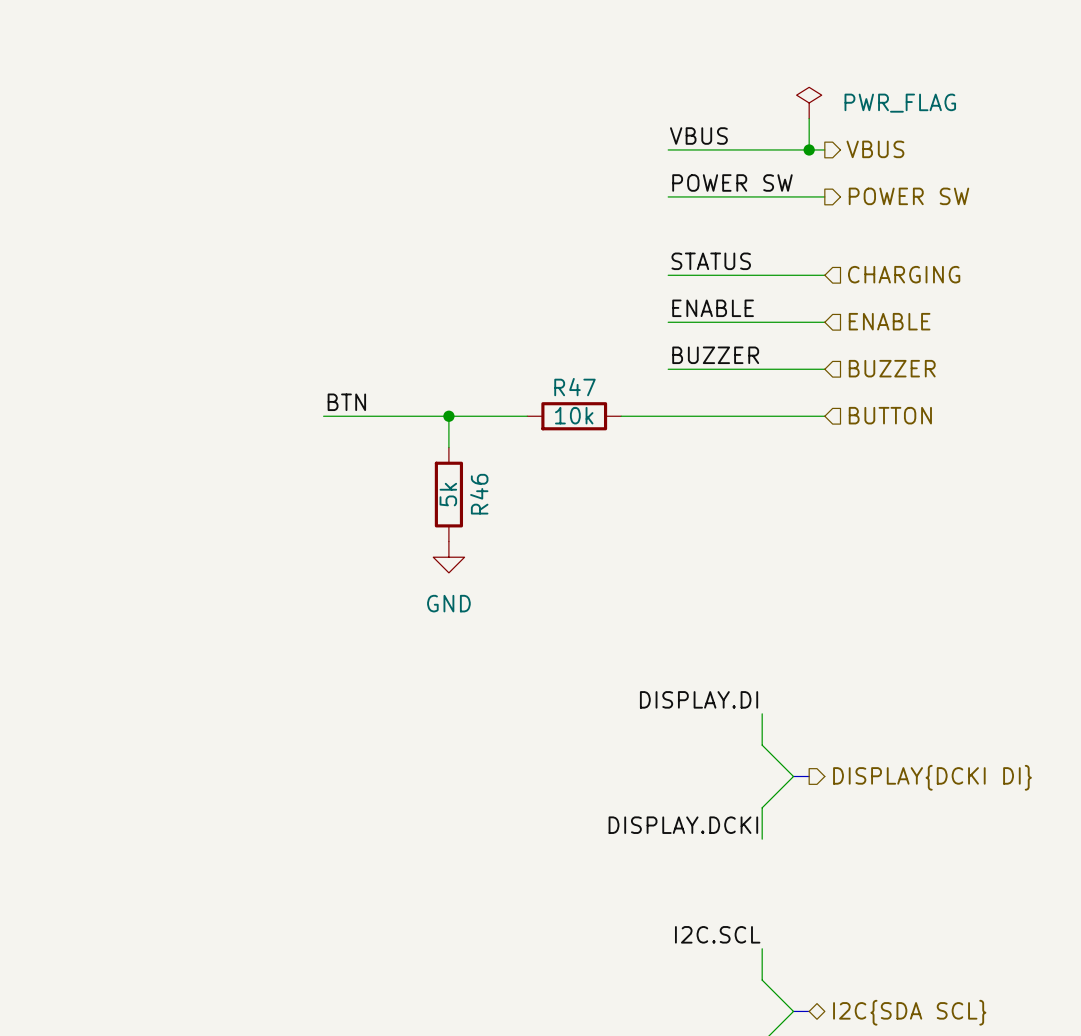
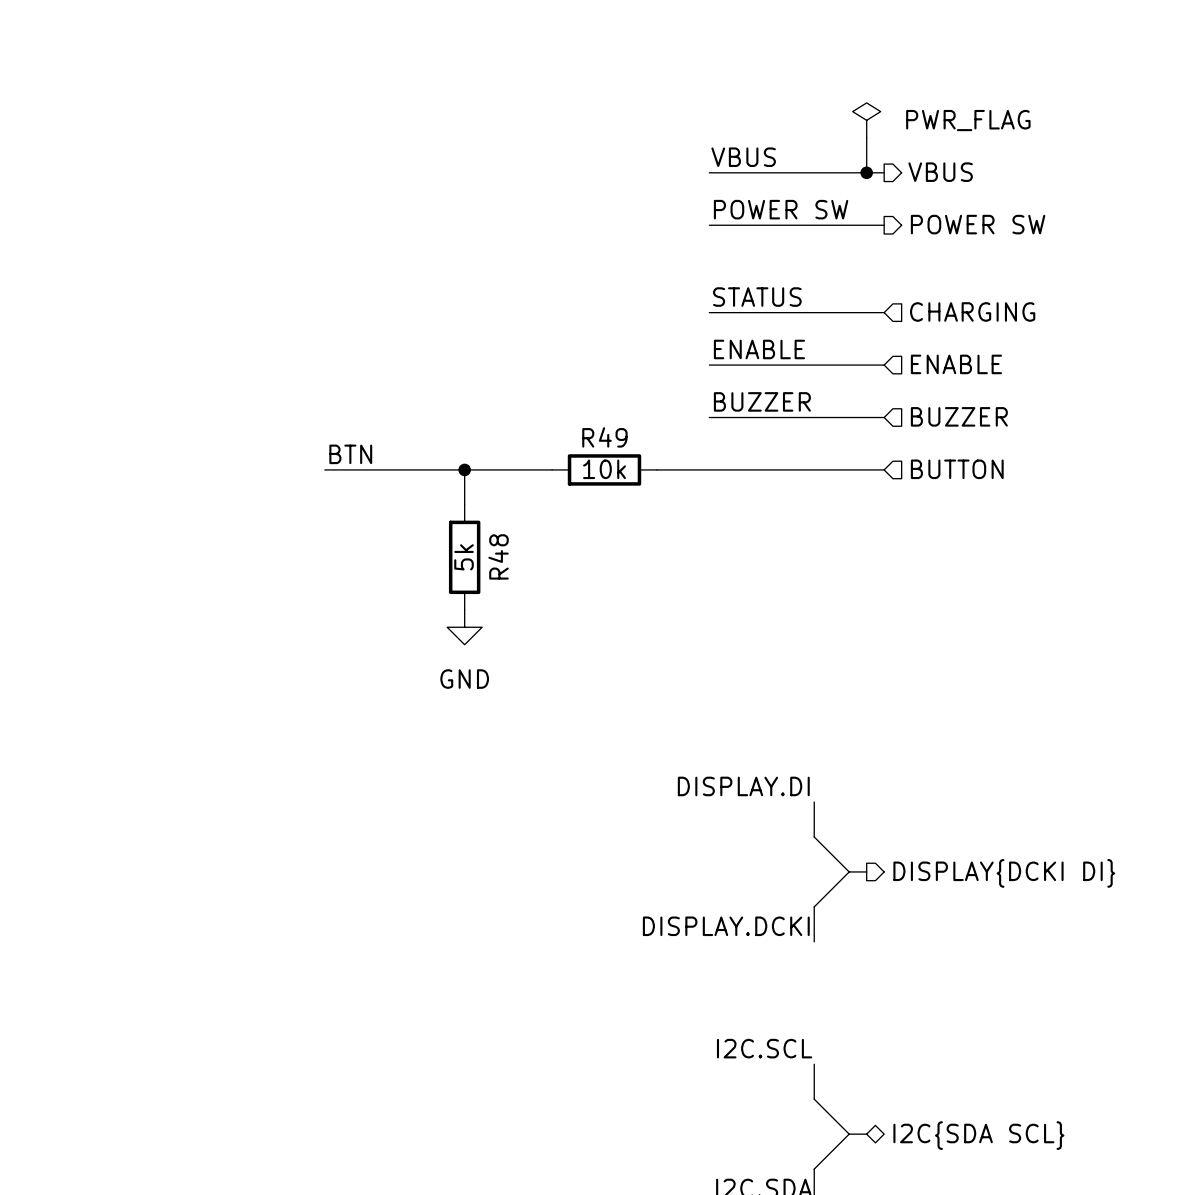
R47 name: R47 (574, 387) -> R49 (604, 437)
R46 name: R46 (479, 494) -> R48 (498, 556)

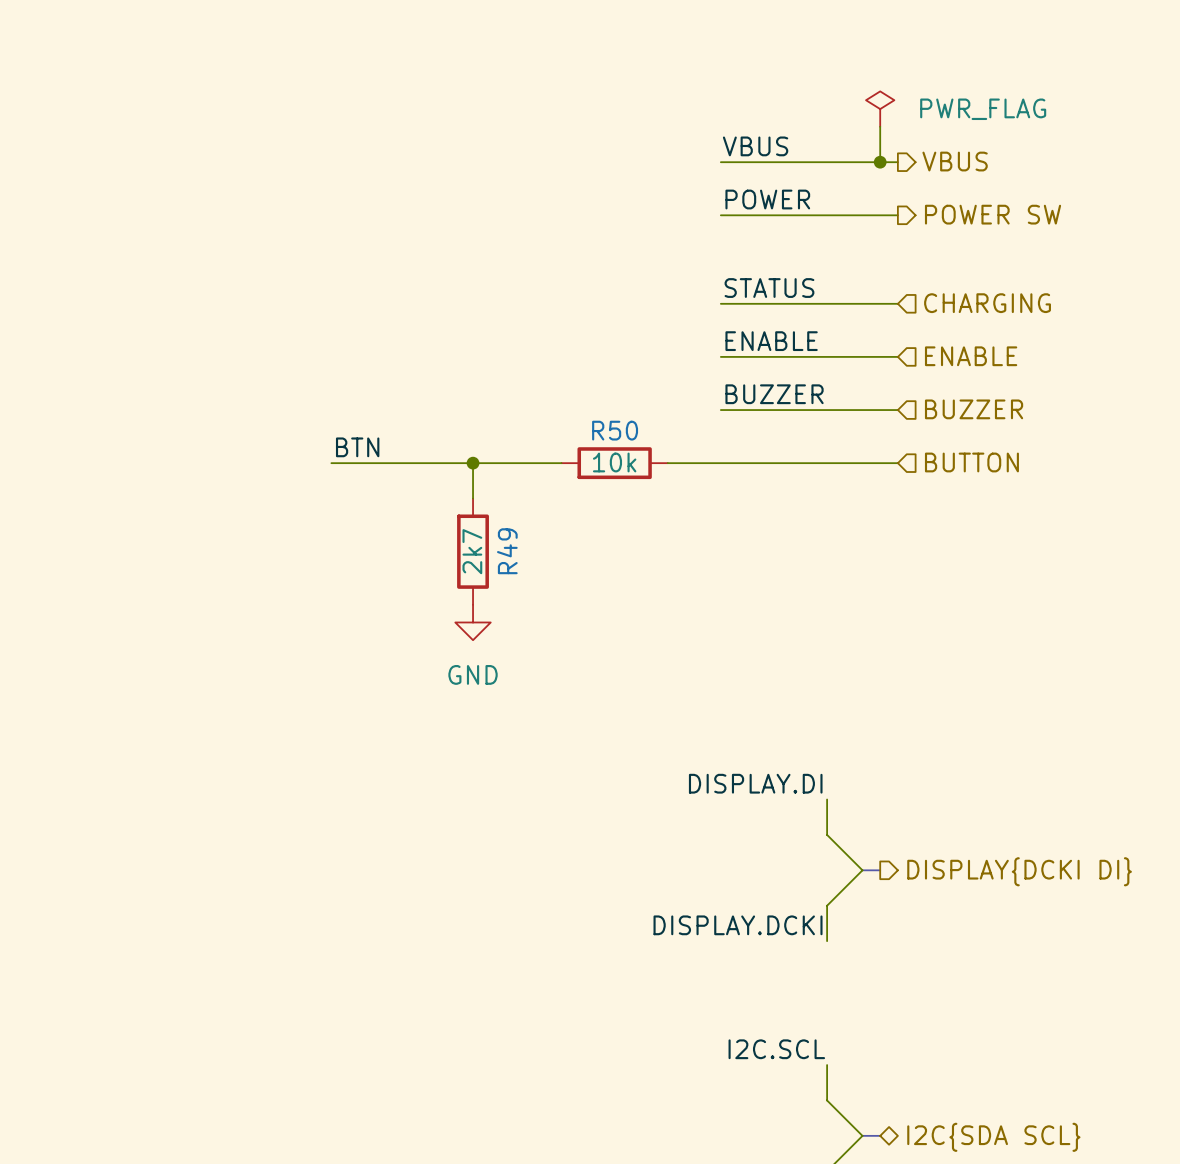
label: POWER SW (781, 209) -> POWER (767, 199)
R49 name: R49 (604, 437) -> R50 (615, 430)
R48 name: R48 (498, 556) -> R49 (507, 551)
R48 value: 5k (464, 557) -> 2k7 (472, 551)

